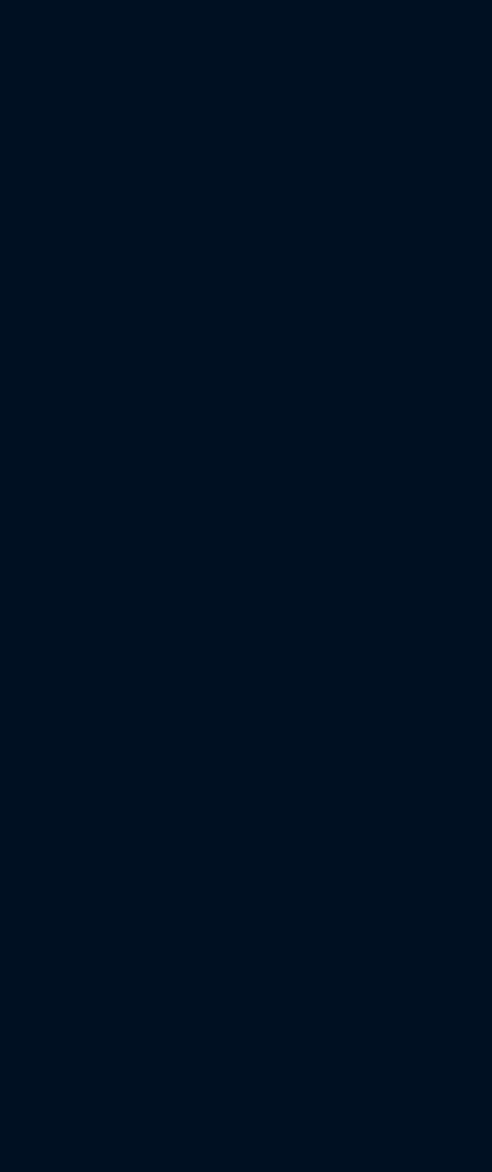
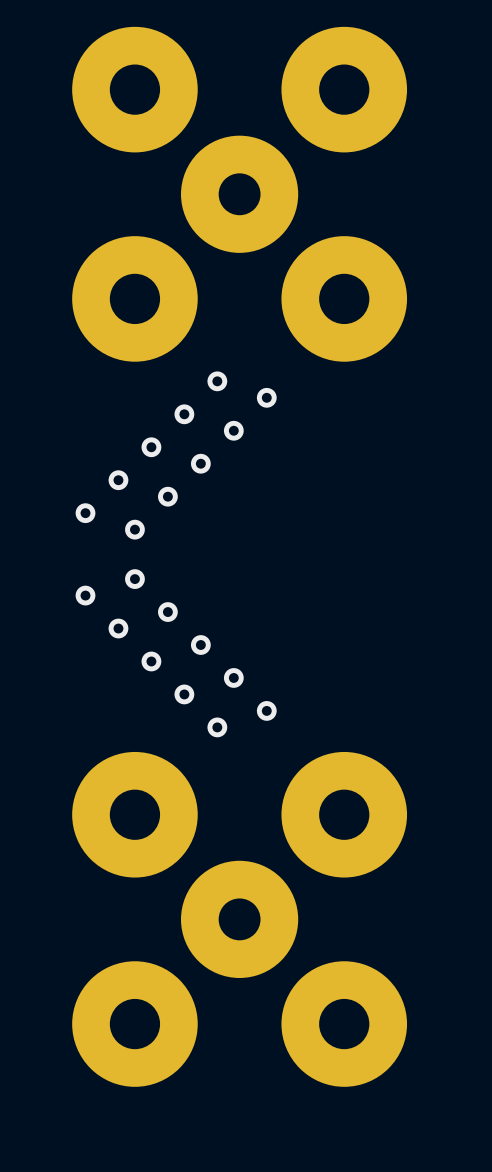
part: none -> (239, 194)
via: none -> (217, 381)
via: none -> (266, 397)
via: none -> (184, 414)
via: none -> (233, 430)
via: none -> (151, 447)
via: none -> (200, 463)
via: none -> (118, 480)
via: none -> (167, 496)
via: none -> (85, 513)
via: none -> (134, 529)
via: none -> (134, 579)
via: none -> (85, 595)
via: none -> (167, 612)
via: none -> (118, 628)
via: none -> (200, 645)
via: none -> (151, 661)
via: none -> (233, 677)
via: none -> (184, 694)
via: none -> (266, 710)
via: none -> (217, 727)
part: none -> (239, 919)

